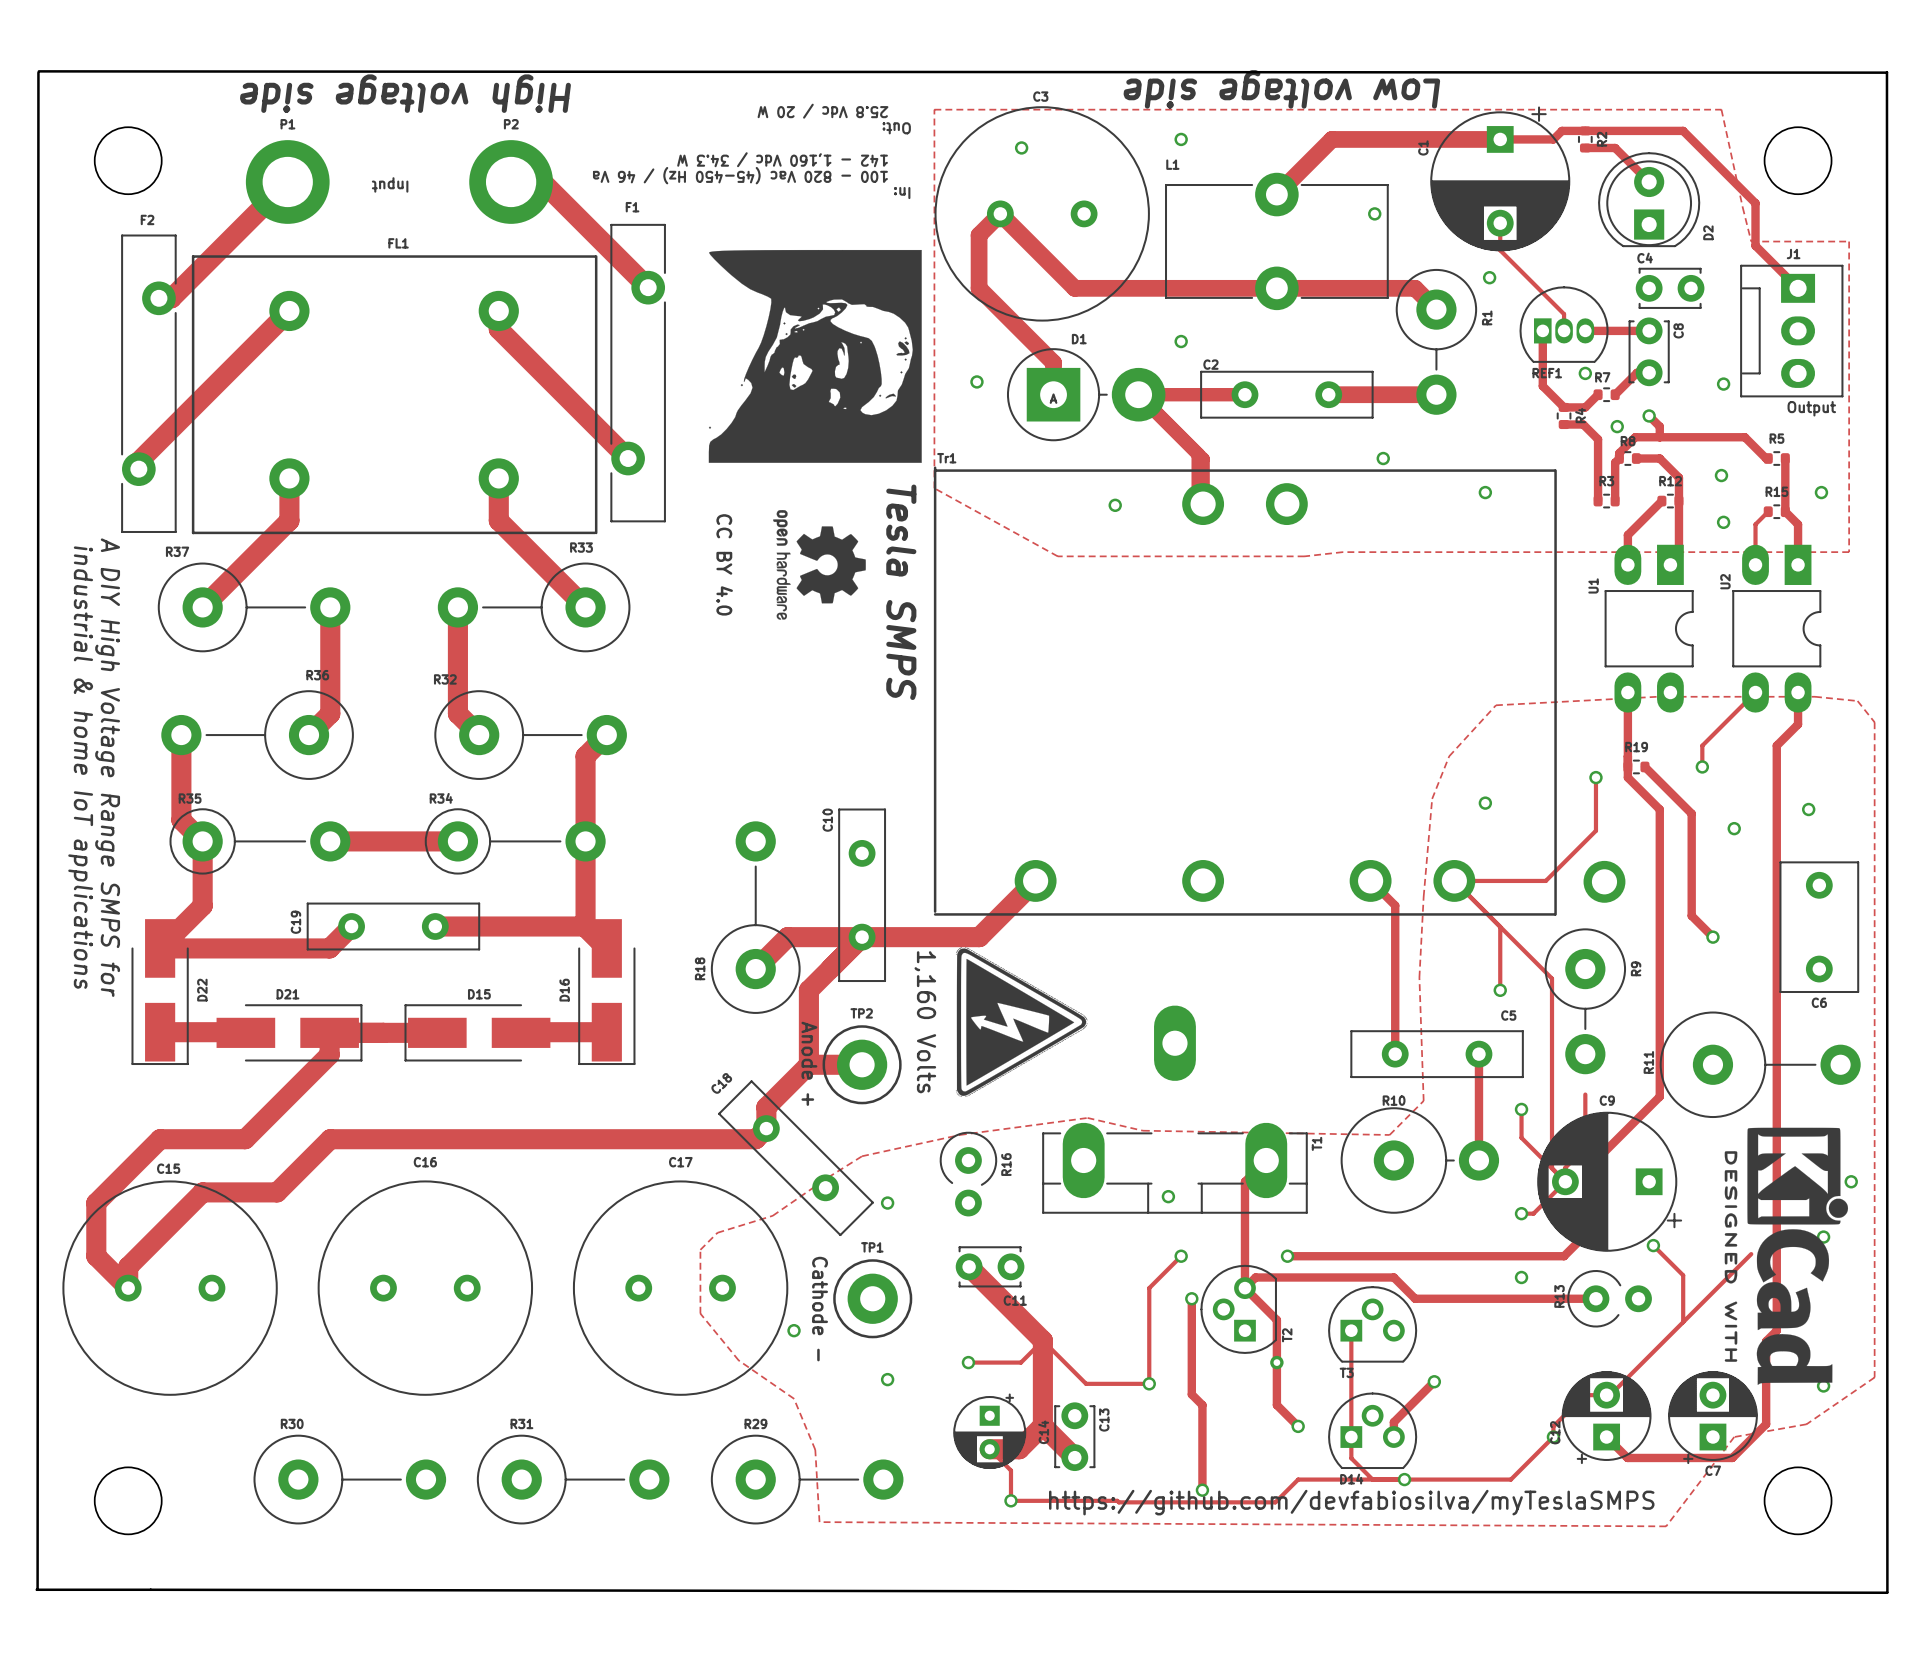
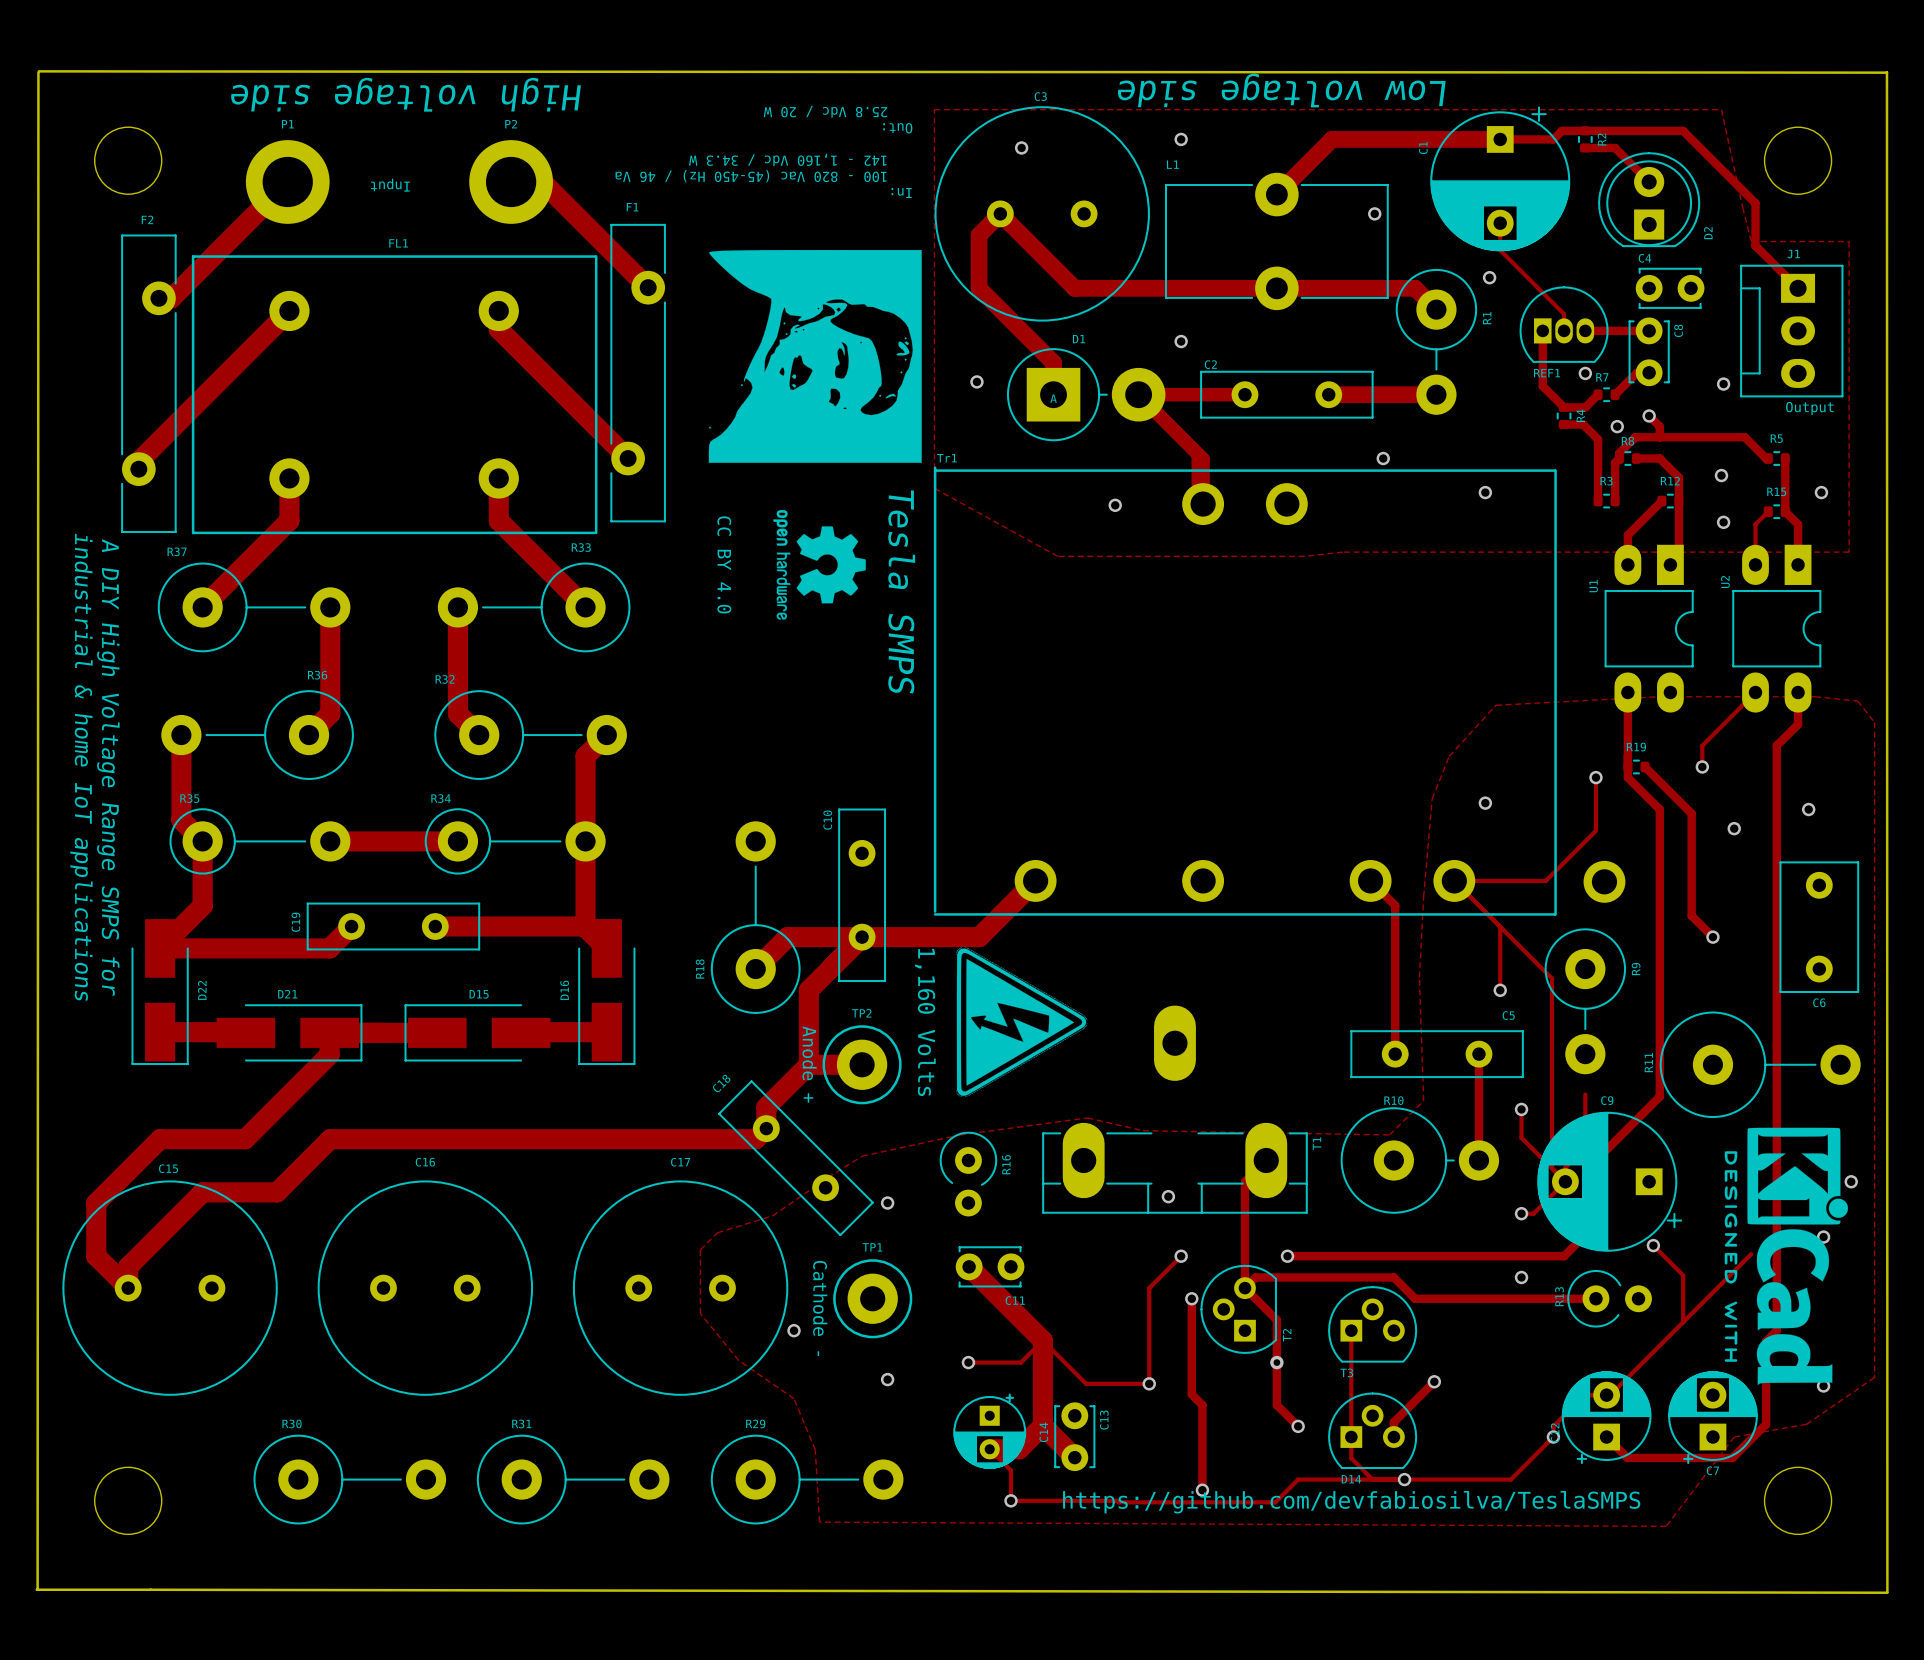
text: https://github.com/devfabiosilva/myTeslaSMPS (1351, 1502) -> https://github.com/devfabiosilva/TeslaSMPS (1351, 1502)

